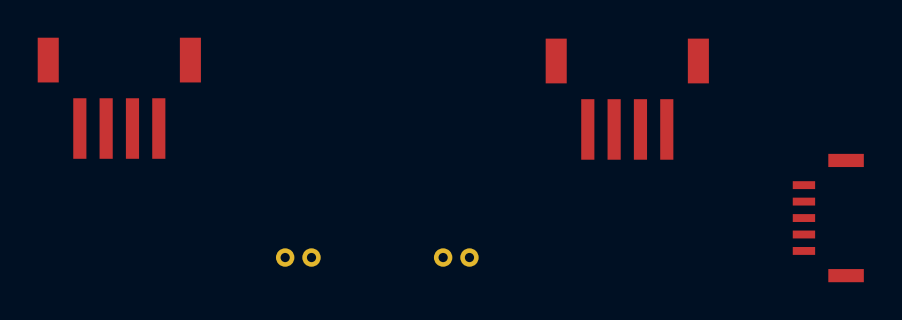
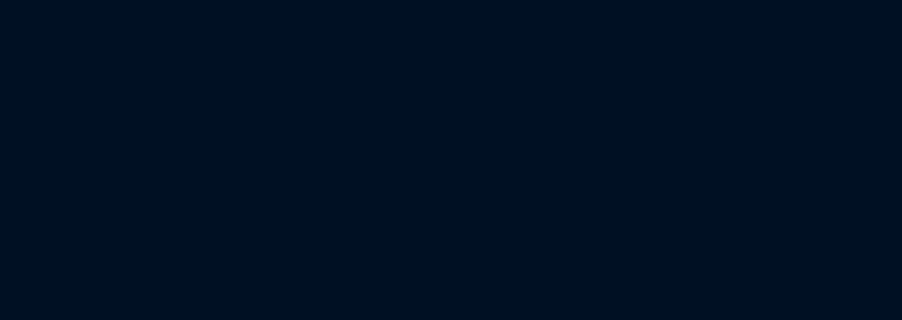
part: (119, 98) -> none
part: (627, 99) -> none
part: (828, 218) -> none
part: (298, 257) -> none
part: (456, 257) -> none

